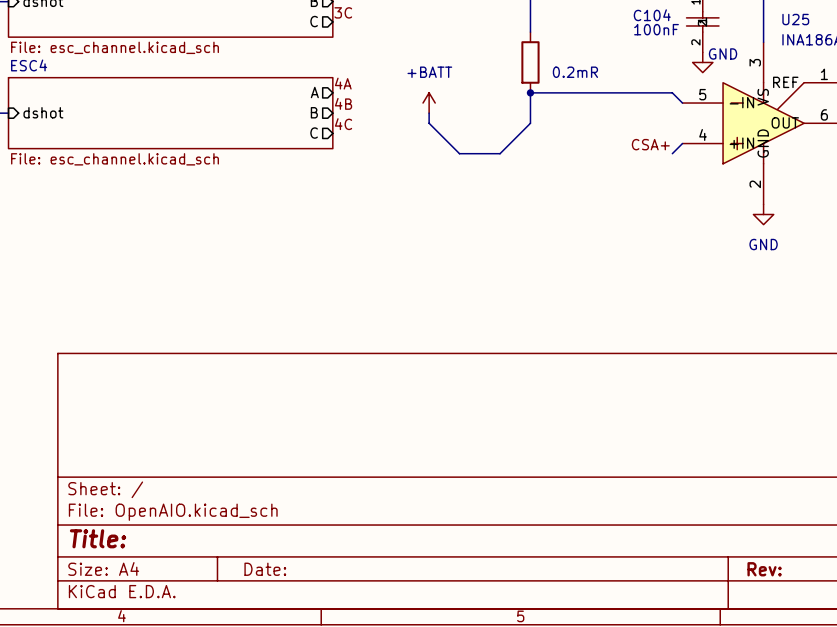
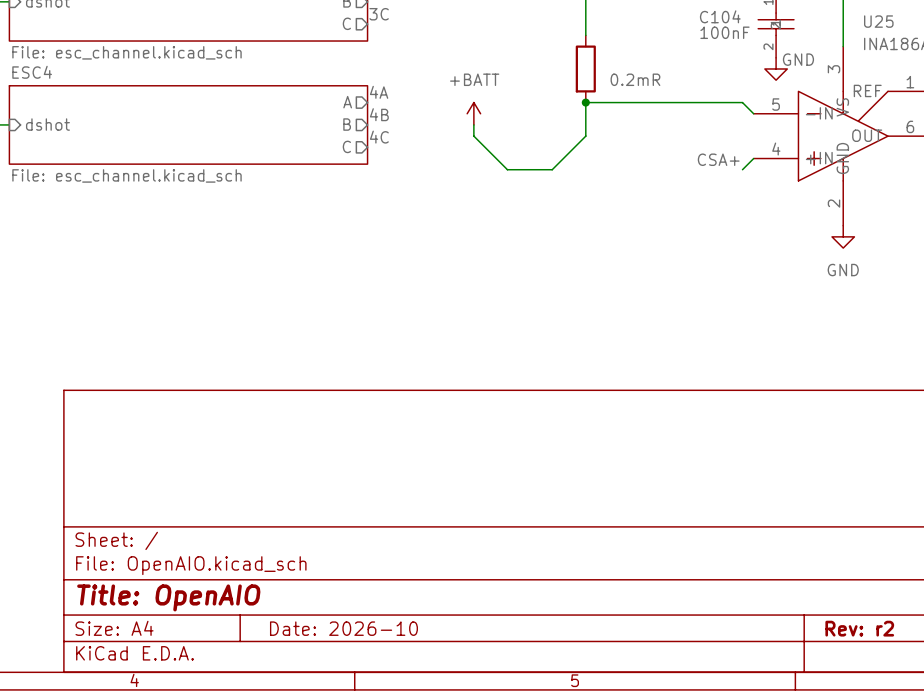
title block: Title: (98, 538) -> Title: OpenAIO (168, 597)
title block: Date: (265, 569) -> Date: 2026-10 (343, 628)
title block: Rev: (764, 569) -> Rev: r2 (859, 628)

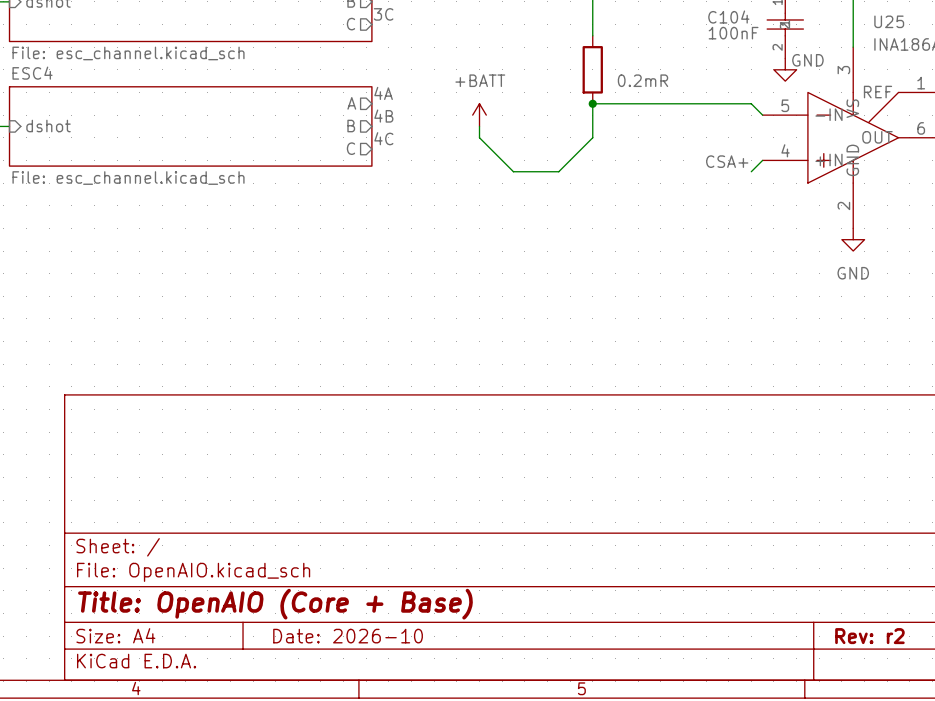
title block: Title: OpenAIO (168, 597) -> Title: OpenAIO (Core + Base) (275, 604)

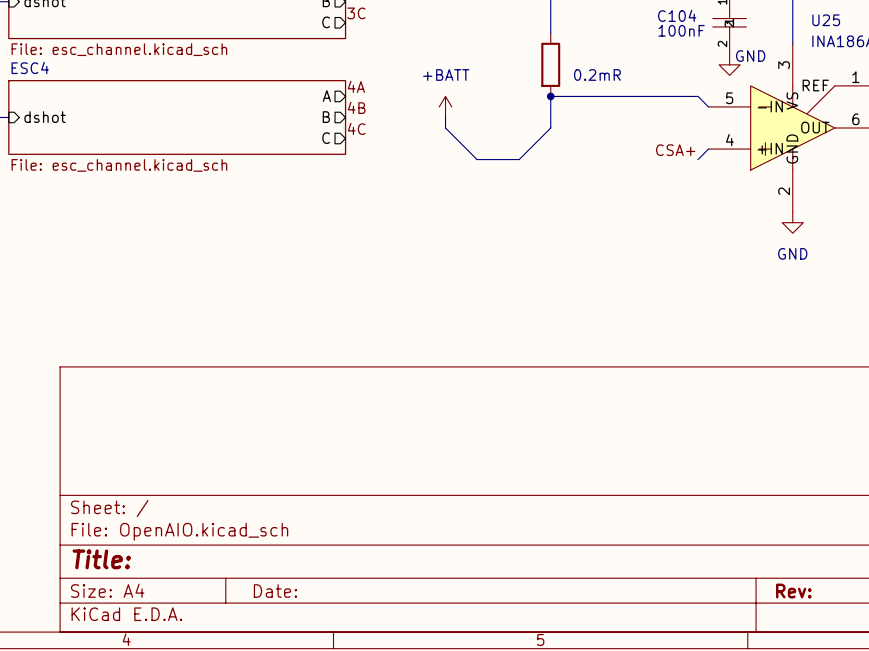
title block: Title: OpenAIO (Core + Base) (275, 604) -> Title: (101, 559)
title block: Date: 2026-10 (348, 636) -> Date: (275, 591)
title block: Rev: r2 (869, 636) -> Rev: (793, 591)

